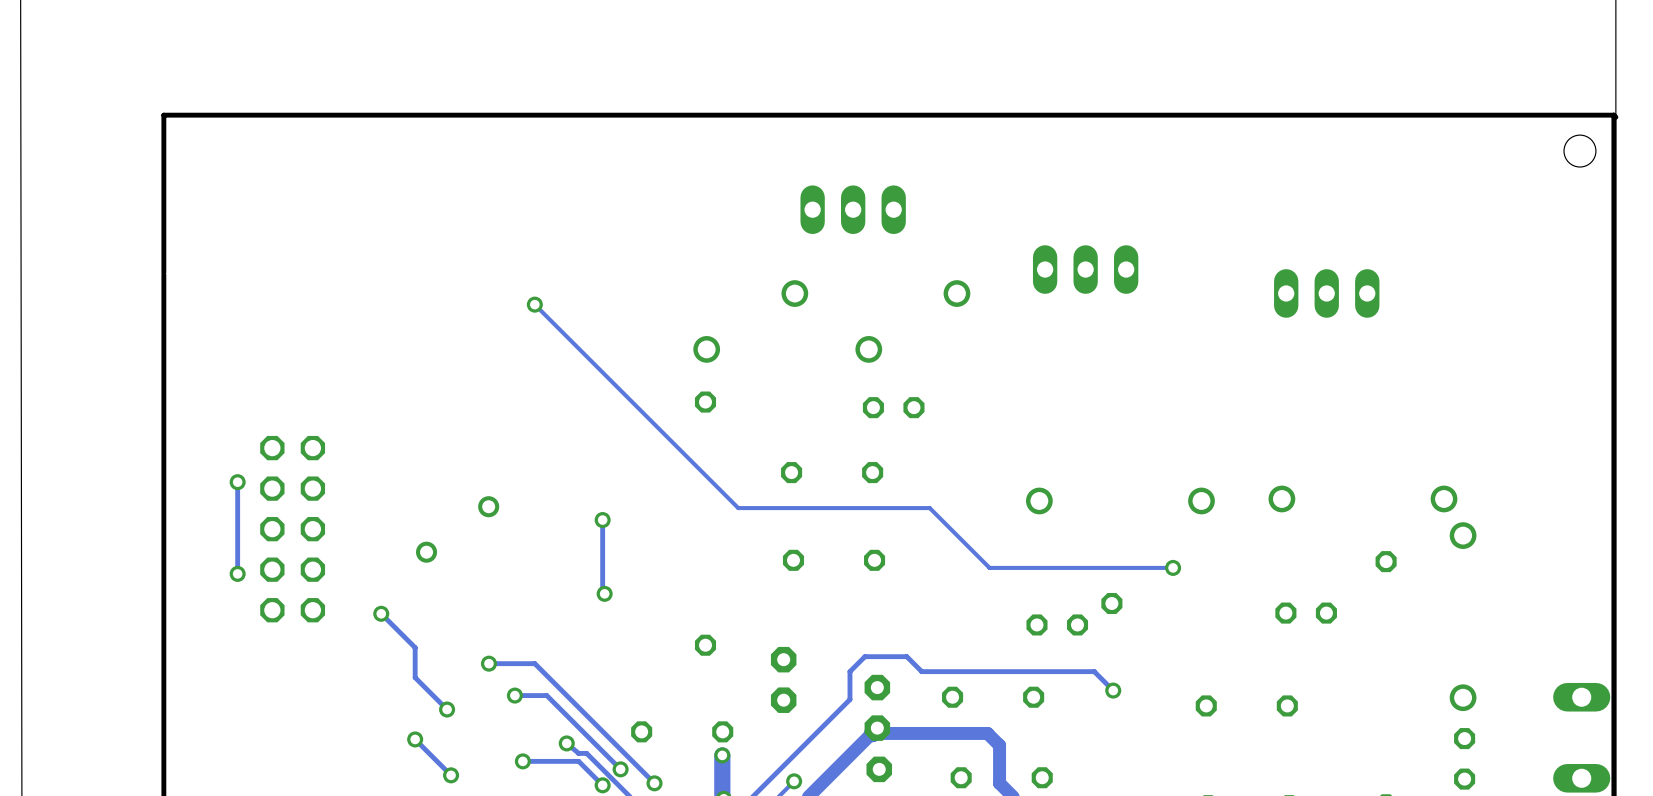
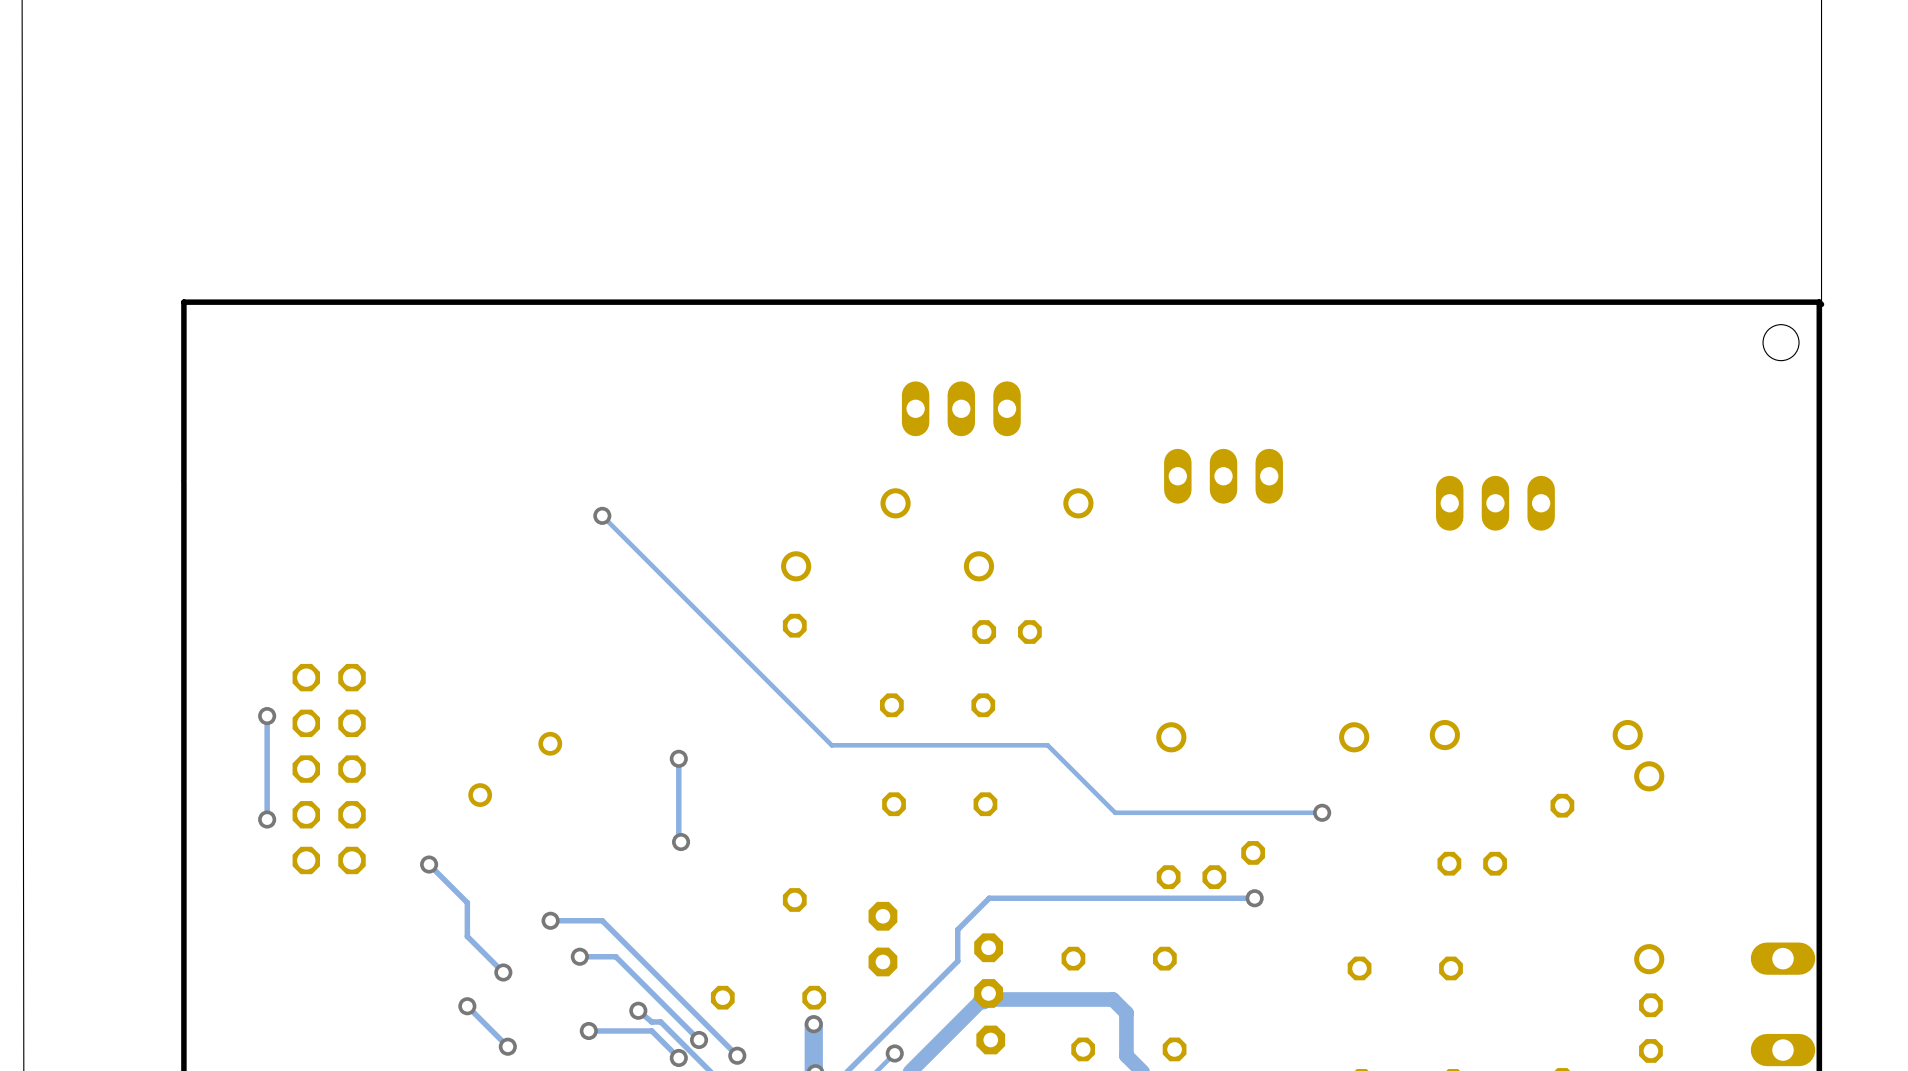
track: (864, 656) (906, 656) (921, 671) (1094, 671) (1113, 690) -> (974, 912) (989, 898) (1254, 898)
via position: (1113, 690) -> (1254, 898)

